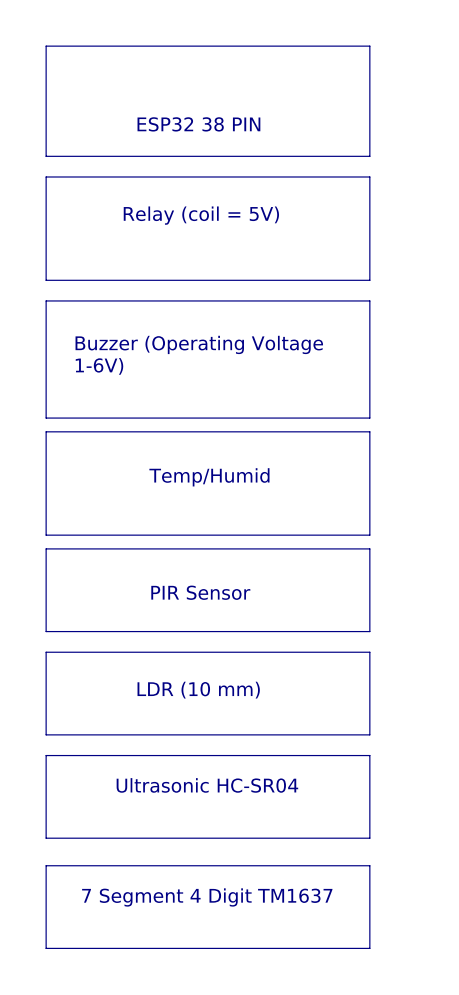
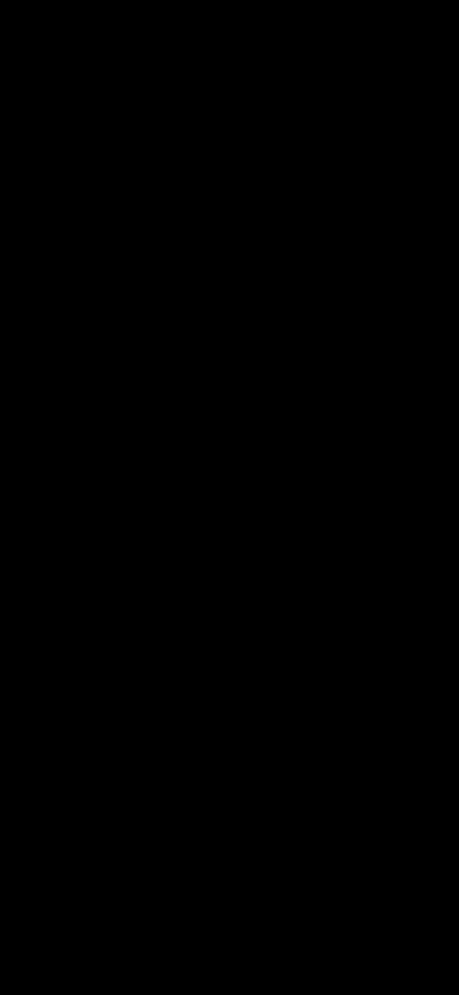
line: (46, 46) (46, 156) (369, 156) (369, 46) (46, 46) -> none
text: ESP32 38 PIN (198, 124) -> none
line: (46, 176) (46, 280) (369, 280) (369, 176) (46, 176) -> none
text: Relay (coil = 5V) (201, 215) -> none
line: (46, 300) (369, 300) (369, 418) (46, 418) (46, 300) -> none
text: Buzzer (Operating Voltage (199, 344) -> none
text: 1-6V) (99, 366) -> none
line: (46, 431) (46, 535) (369, 535) (369, 431) (46, 431) -> none
text: Temp/Humid (209, 477) -> none
line: (46, 548) (46, 631) (369, 631) (369, 548) (46, 548) -> none
text: PIR Sensor (200, 592) -> none
line: (46, 652) (46, 734) (369, 734) (369, 652) (46, 652) -> none
text: LDR (10 mm) (198, 690) -> none
line: (46, 755) (46, 838) (369, 838) (369, 755) (46, 755) -> none
text: Ultrasonic HC-SR04 (207, 785) -> none
line: (46, 865) (46, 948) (369, 948) (369, 865) (46, 865) -> none
text: 7 Segment 4 Digit TM1637 (207, 897) -> none

